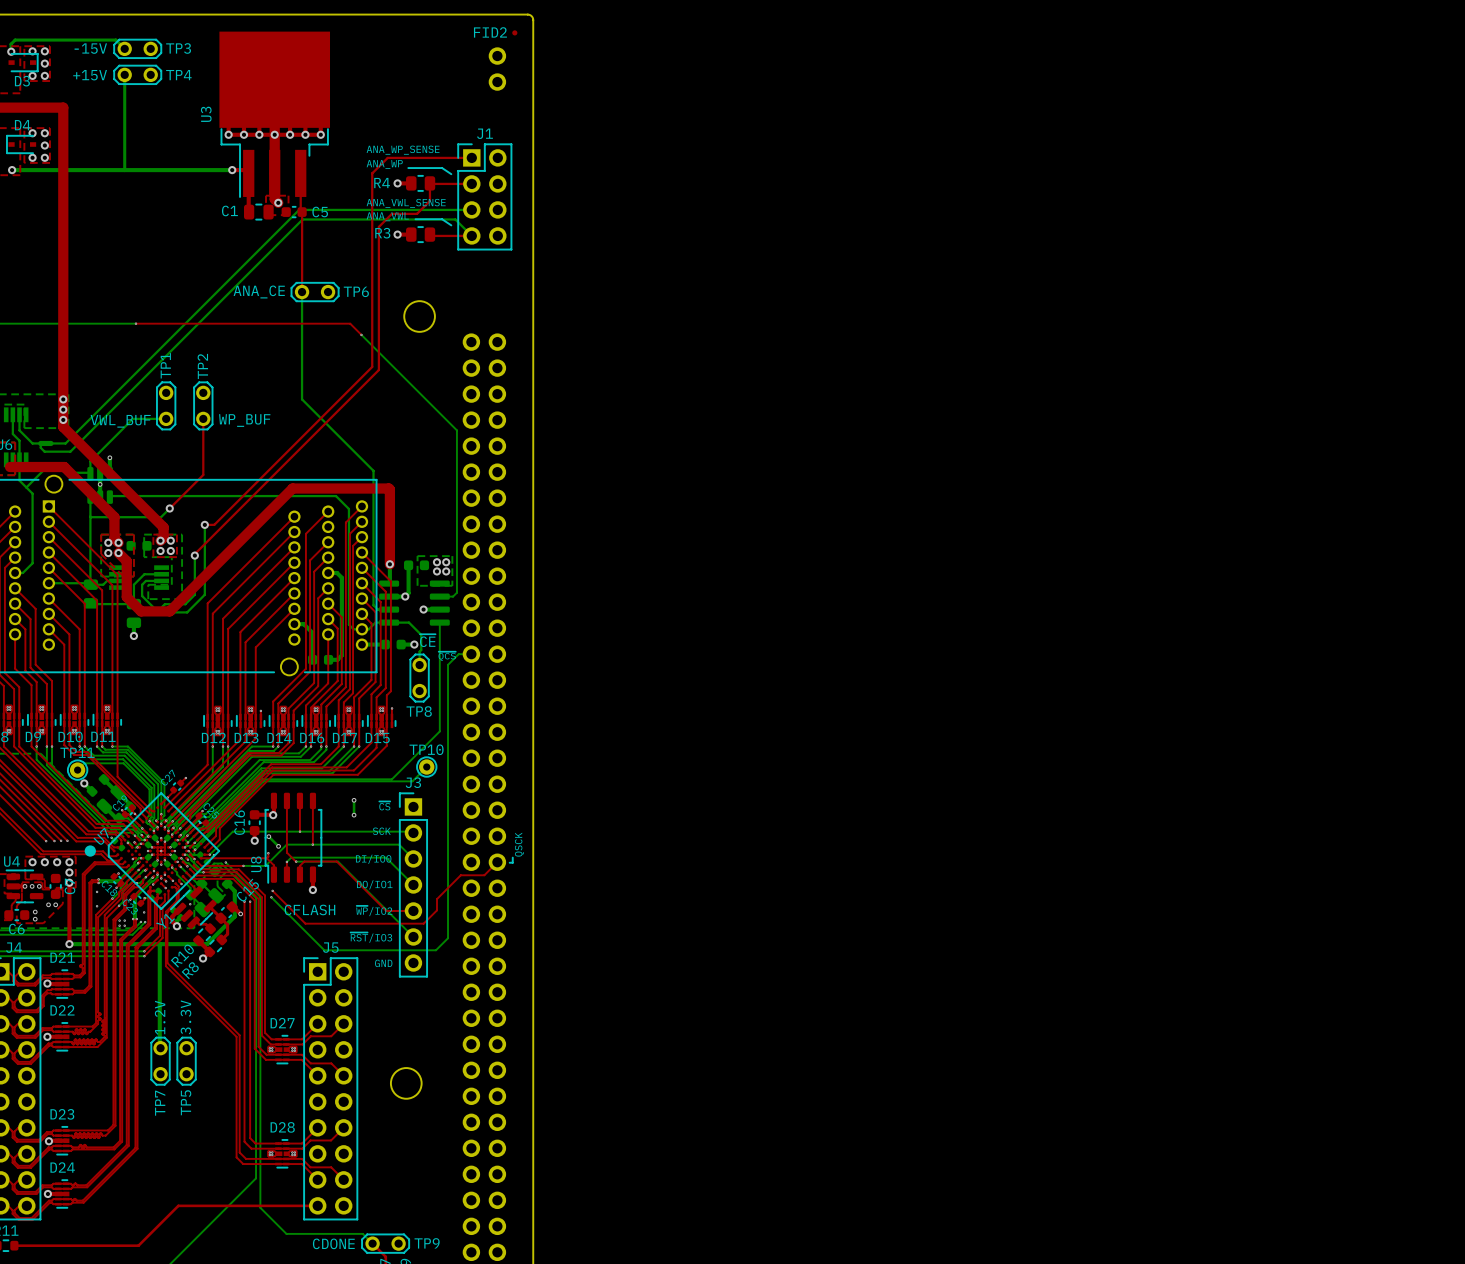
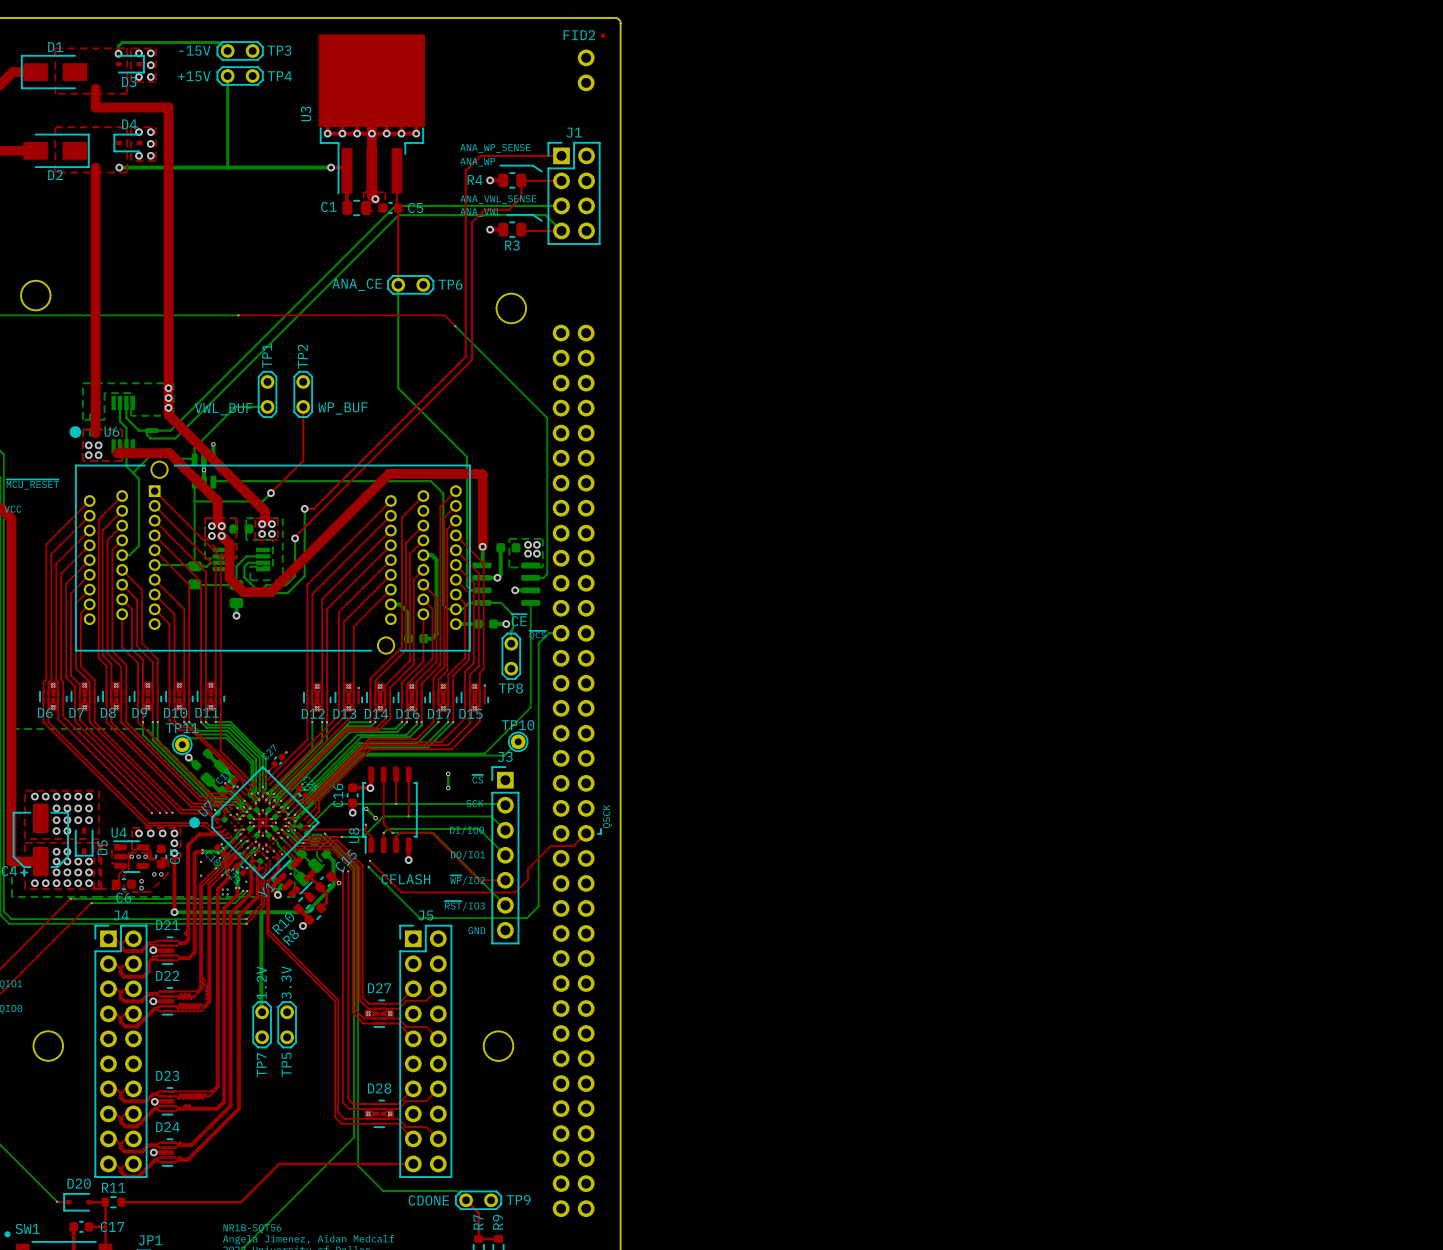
R3 name position: R3 (382, 233) -> R3 (512, 245)

